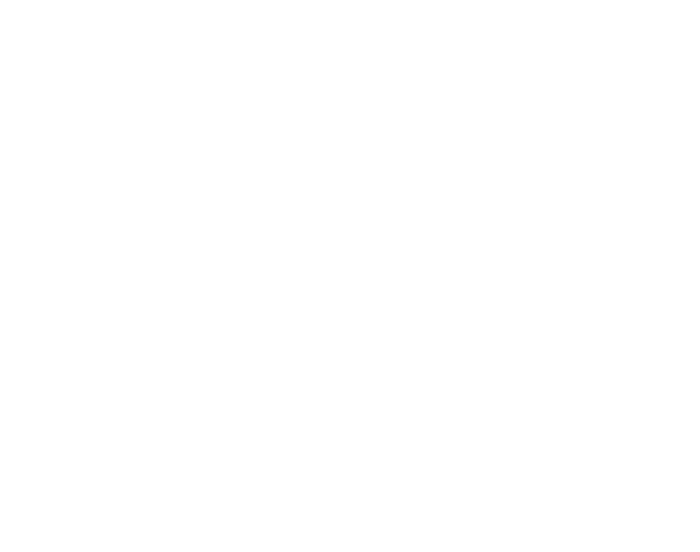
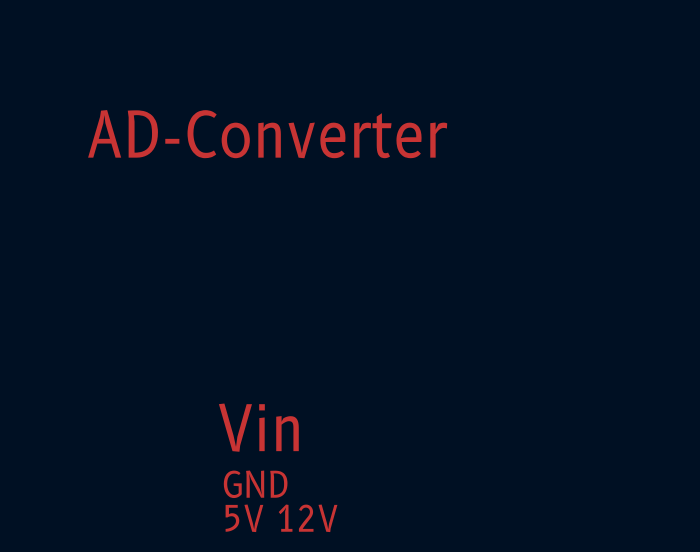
text: none -> AD-Converter (267, 134)
text: none -> Vin (258, 427)
text: none -> GND (255, 484)
text: none -> 5V 12V (281, 518)

